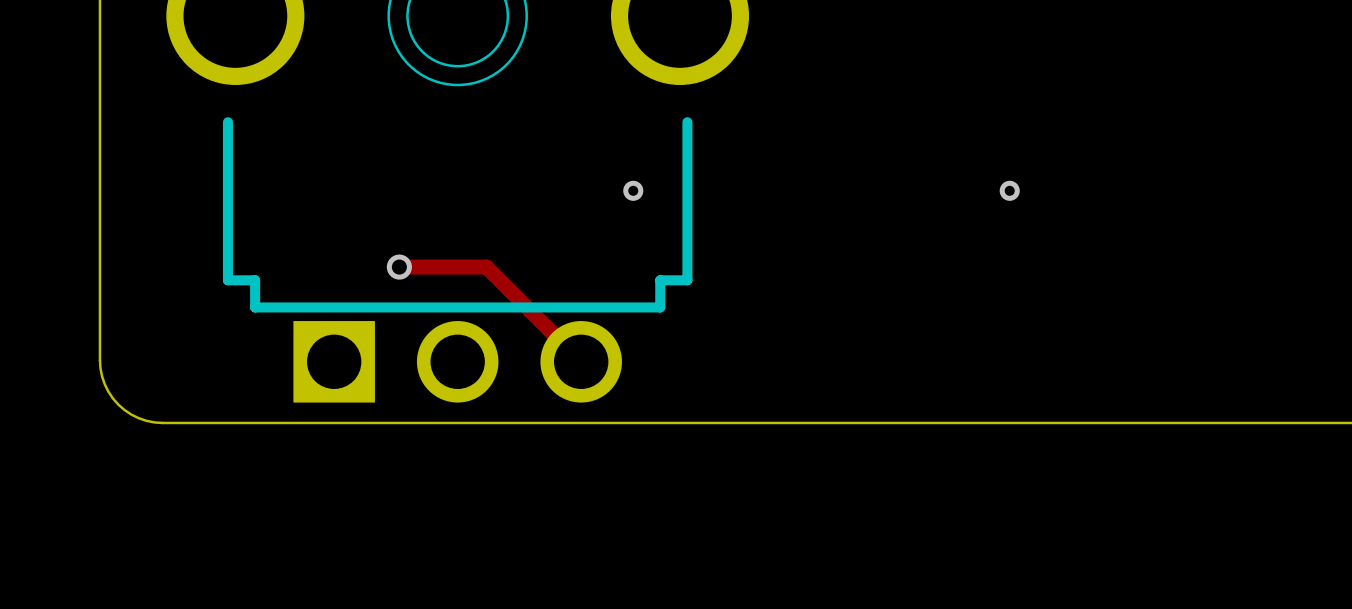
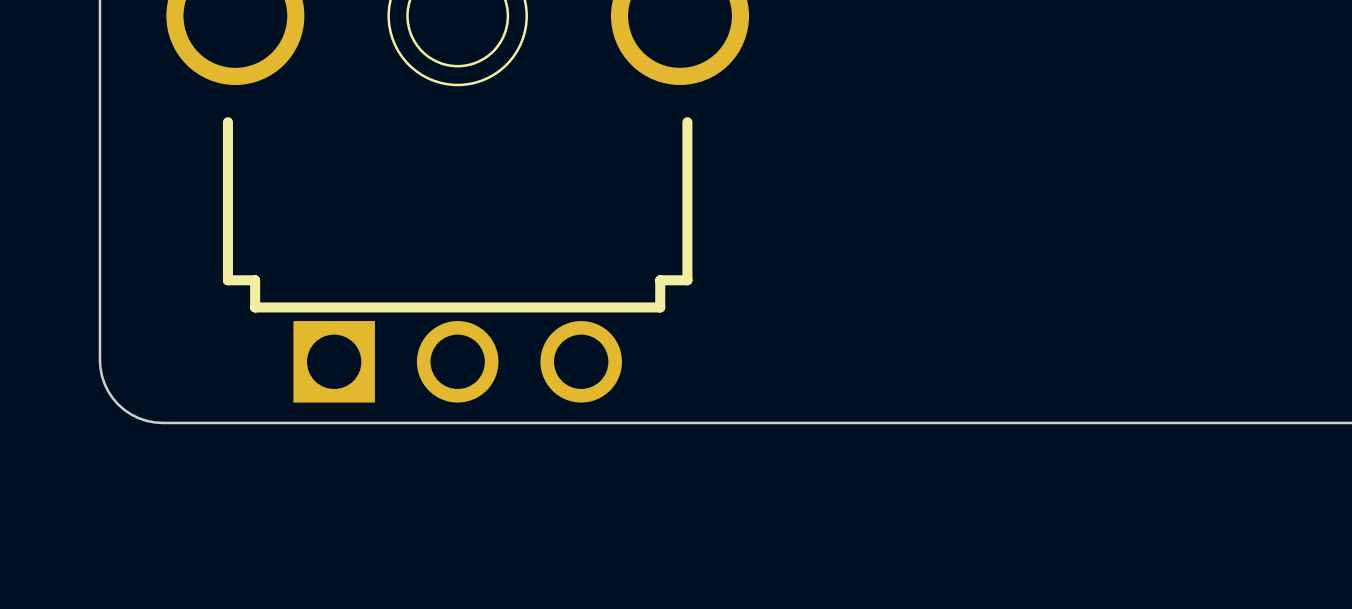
via: (633, 190) -> none
via: (1009, 190) -> none
track: (399, 267) (486, 267) (581, 361) -> none
via: (399, 267) -> none

